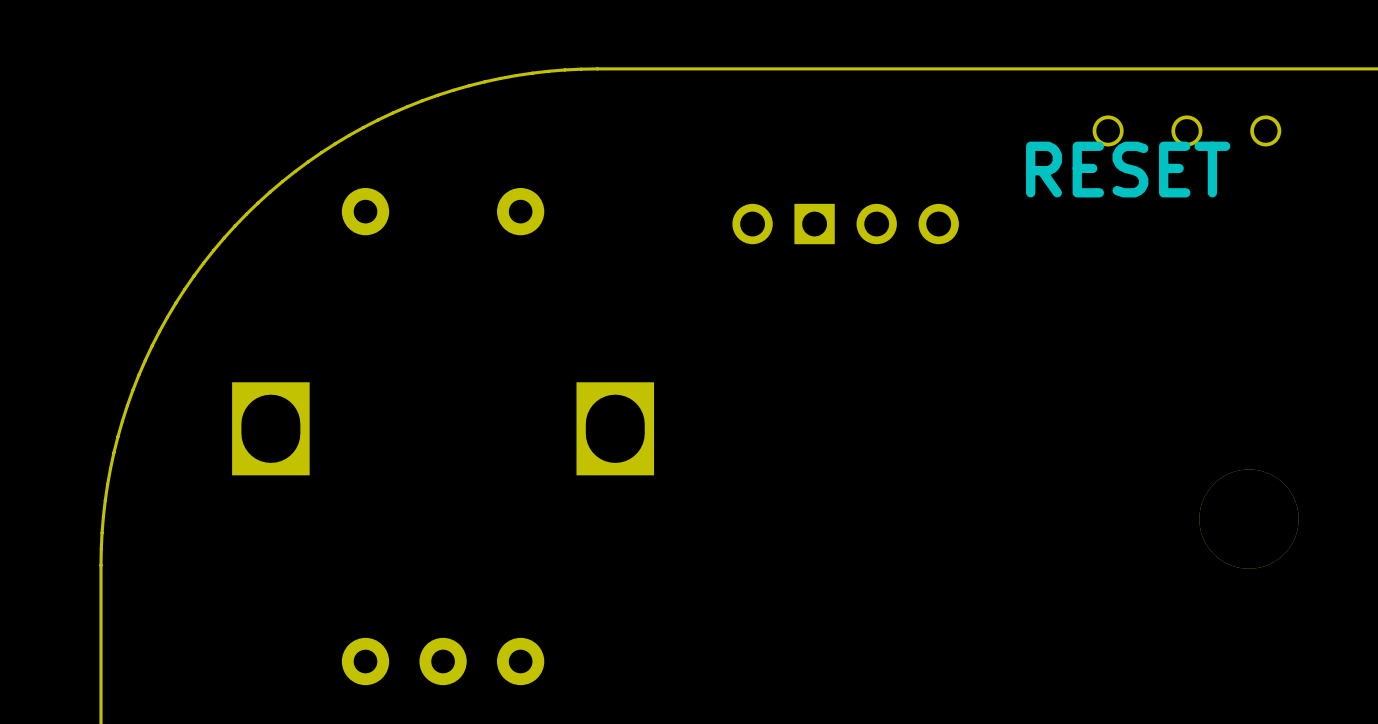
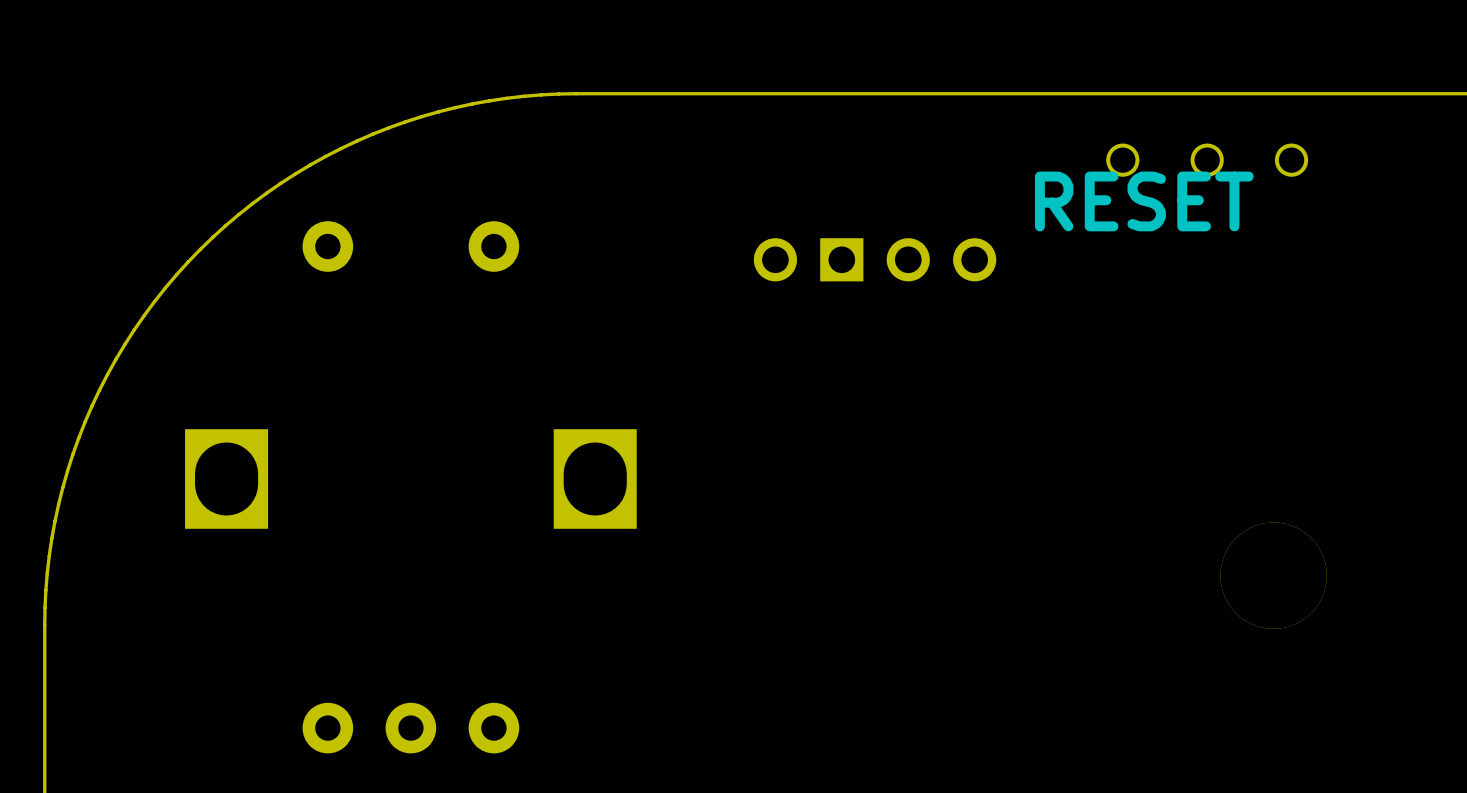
part position: (845, 224) -> (875, 259)

